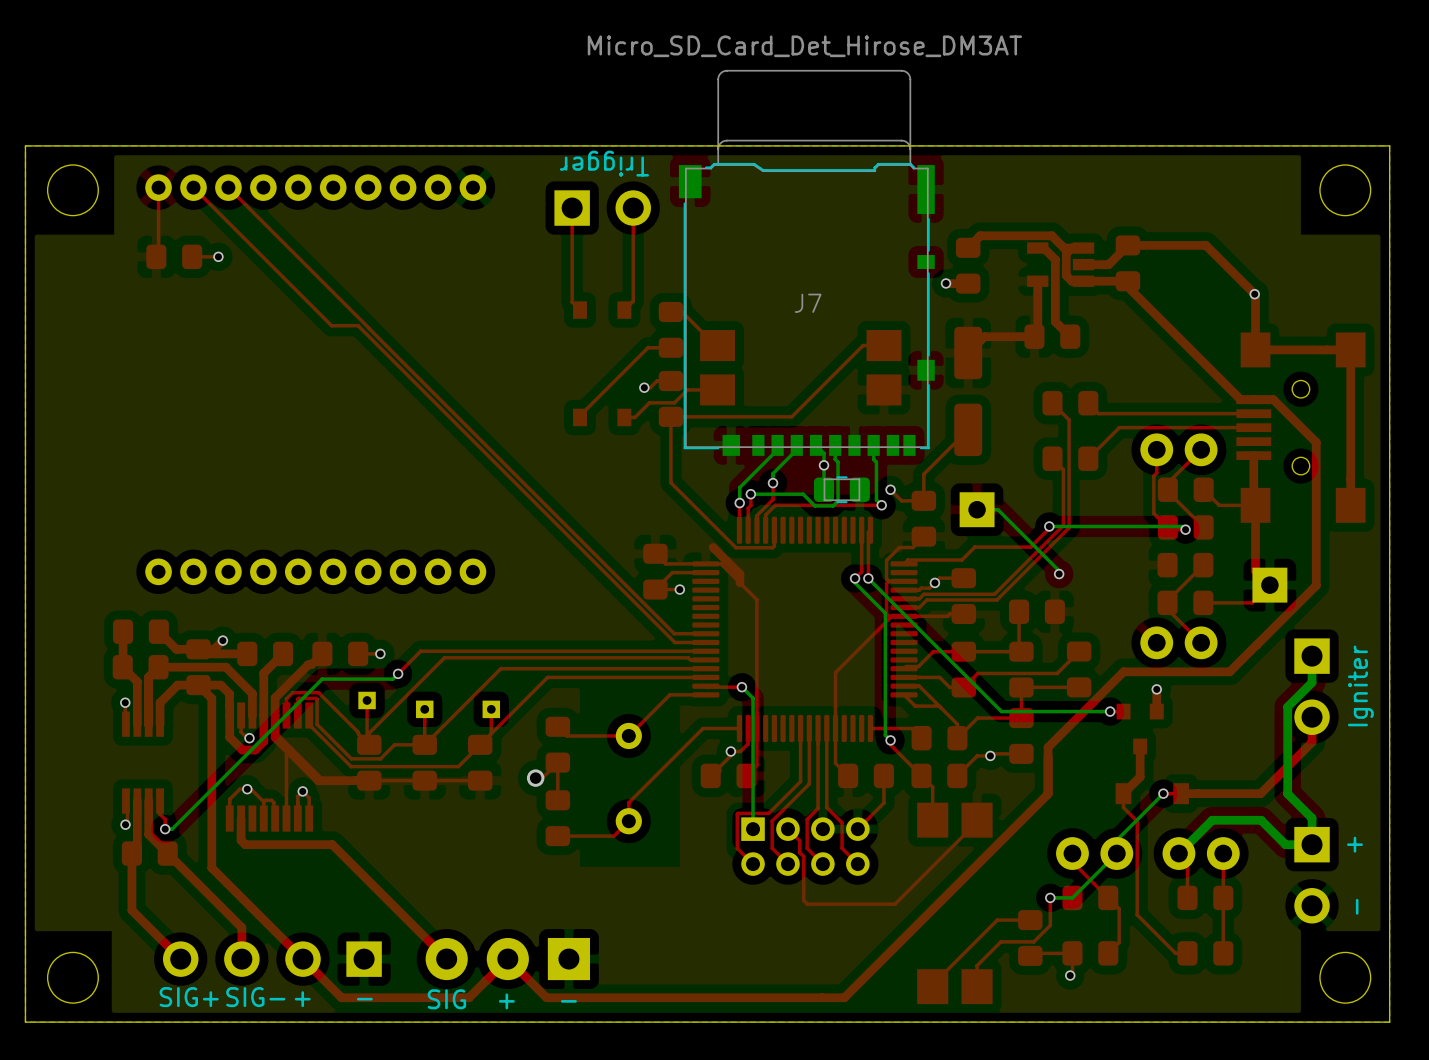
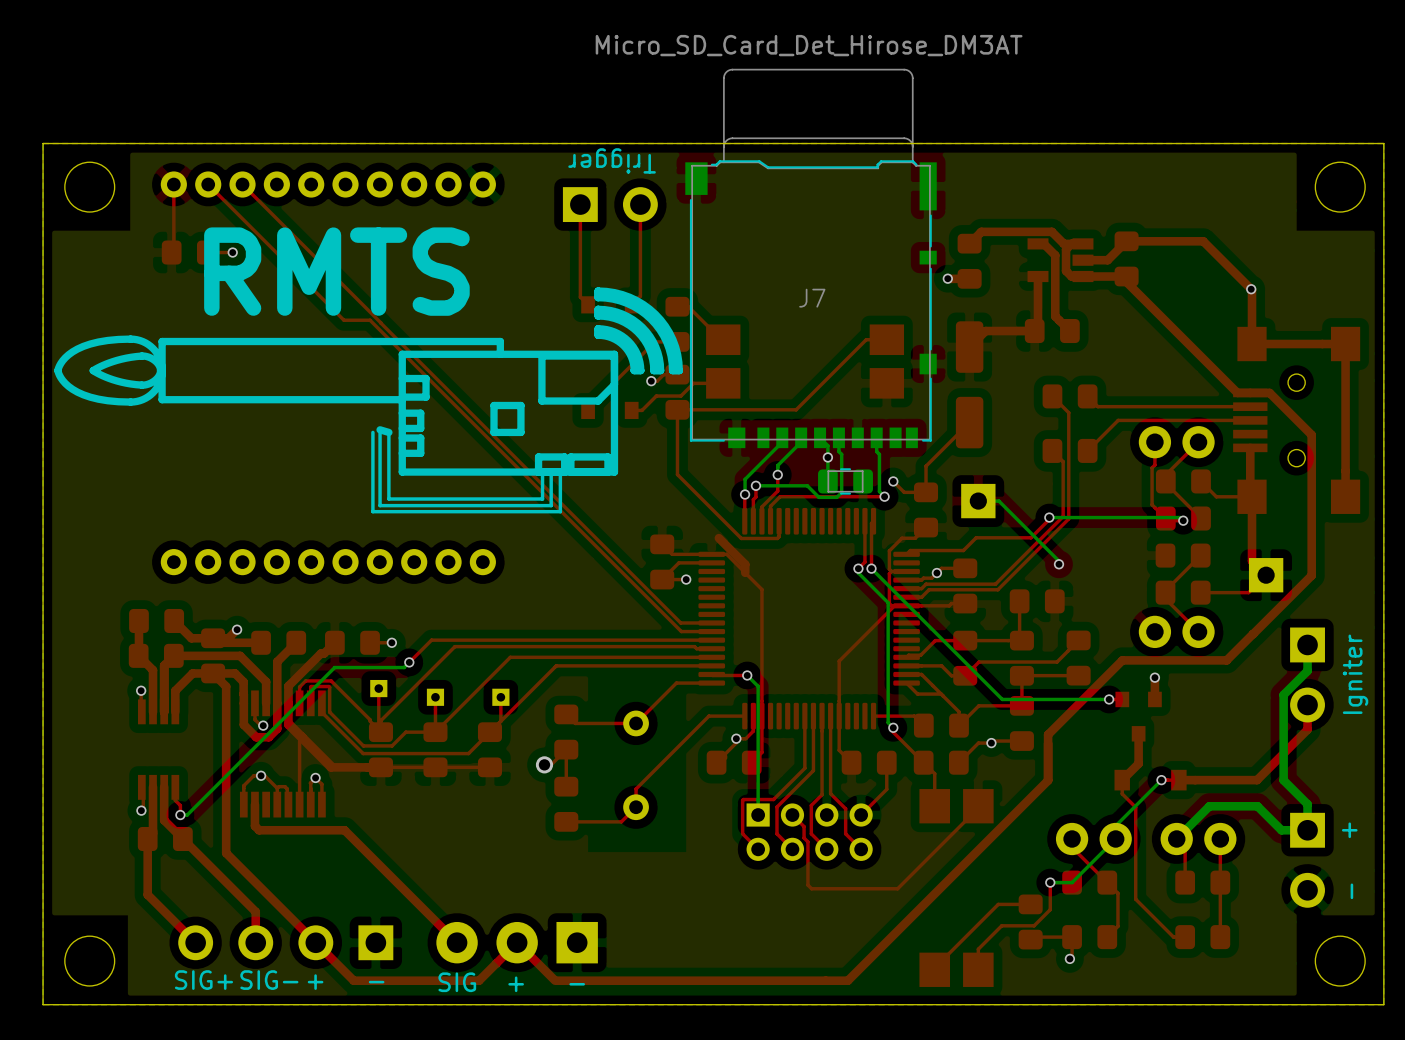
text: none -> RMTS (336, 271)
line: none -> (598, 291) (598, 297) (627, 303) (650, 319) (666, 342) (672, 370) (679, 370) (677, 354) (672, 339) (655, 314) (629, 297) (614, 292) (598, 291)
line: none -> (598, 309) (598, 315) (619, 320) (637, 331) (649, 349) (653, 370) (660, 370) (655, 346) (642, 327) (622, 314) (598, 309)
line: none -> (598, 328) (598, 335) (612, 338) (623, 345) (631, 356) (634, 370) (640, 370) (637, 354) (628, 341) (614, 332) (598, 328)
line: none -> (130, 339) (139, 340) (150, 346) (158, 355) (161, 364) (159, 382) (154, 390) (145, 398) (130, 402) (90, 397) (72, 389) (59, 375) (57, 370) (60, 363) (77, 349) (98, 342) (130, 339)
line: none -> (500, 354) (500, 341) (162, 341) (162, 399) (402, 399)
line: none -> (614, 354) (614, 472) (402, 472) (402, 354) (614, 354)
line: none -> (141, 356) (116, 360) (93, 370) (121, 382) (148, 384) (157, 377) (160, 369) (154, 360) (141, 356)
line: none -> (614, 356) (541, 356) (541, 401) (598, 401) (614, 384)
line: none -> (402, 378) (426, 378) (426, 397) (402, 397)
line: none -> (520, 405) (520, 432) (494, 432) (494, 405) (520, 405)
line: none -> (402, 413) (420, 413) (420, 428) (402, 428)
line: none -> (372, 432) (372, 511) (560, 511) (560, 472)
line: none -> (402, 438) (420, 438) (420, 453) (402, 453)
line: none -> (564, 456) (538, 456) (538, 472) (564, 472) (564, 456)
line: none -> (607, 456) (570, 456) (570, 472) (607, 472) (607, 456)
line: none -> (551, 472) (551, 505) (380, 505) (380, 429) (388, 432) (388, 499) (542, 499) (542, 472)

